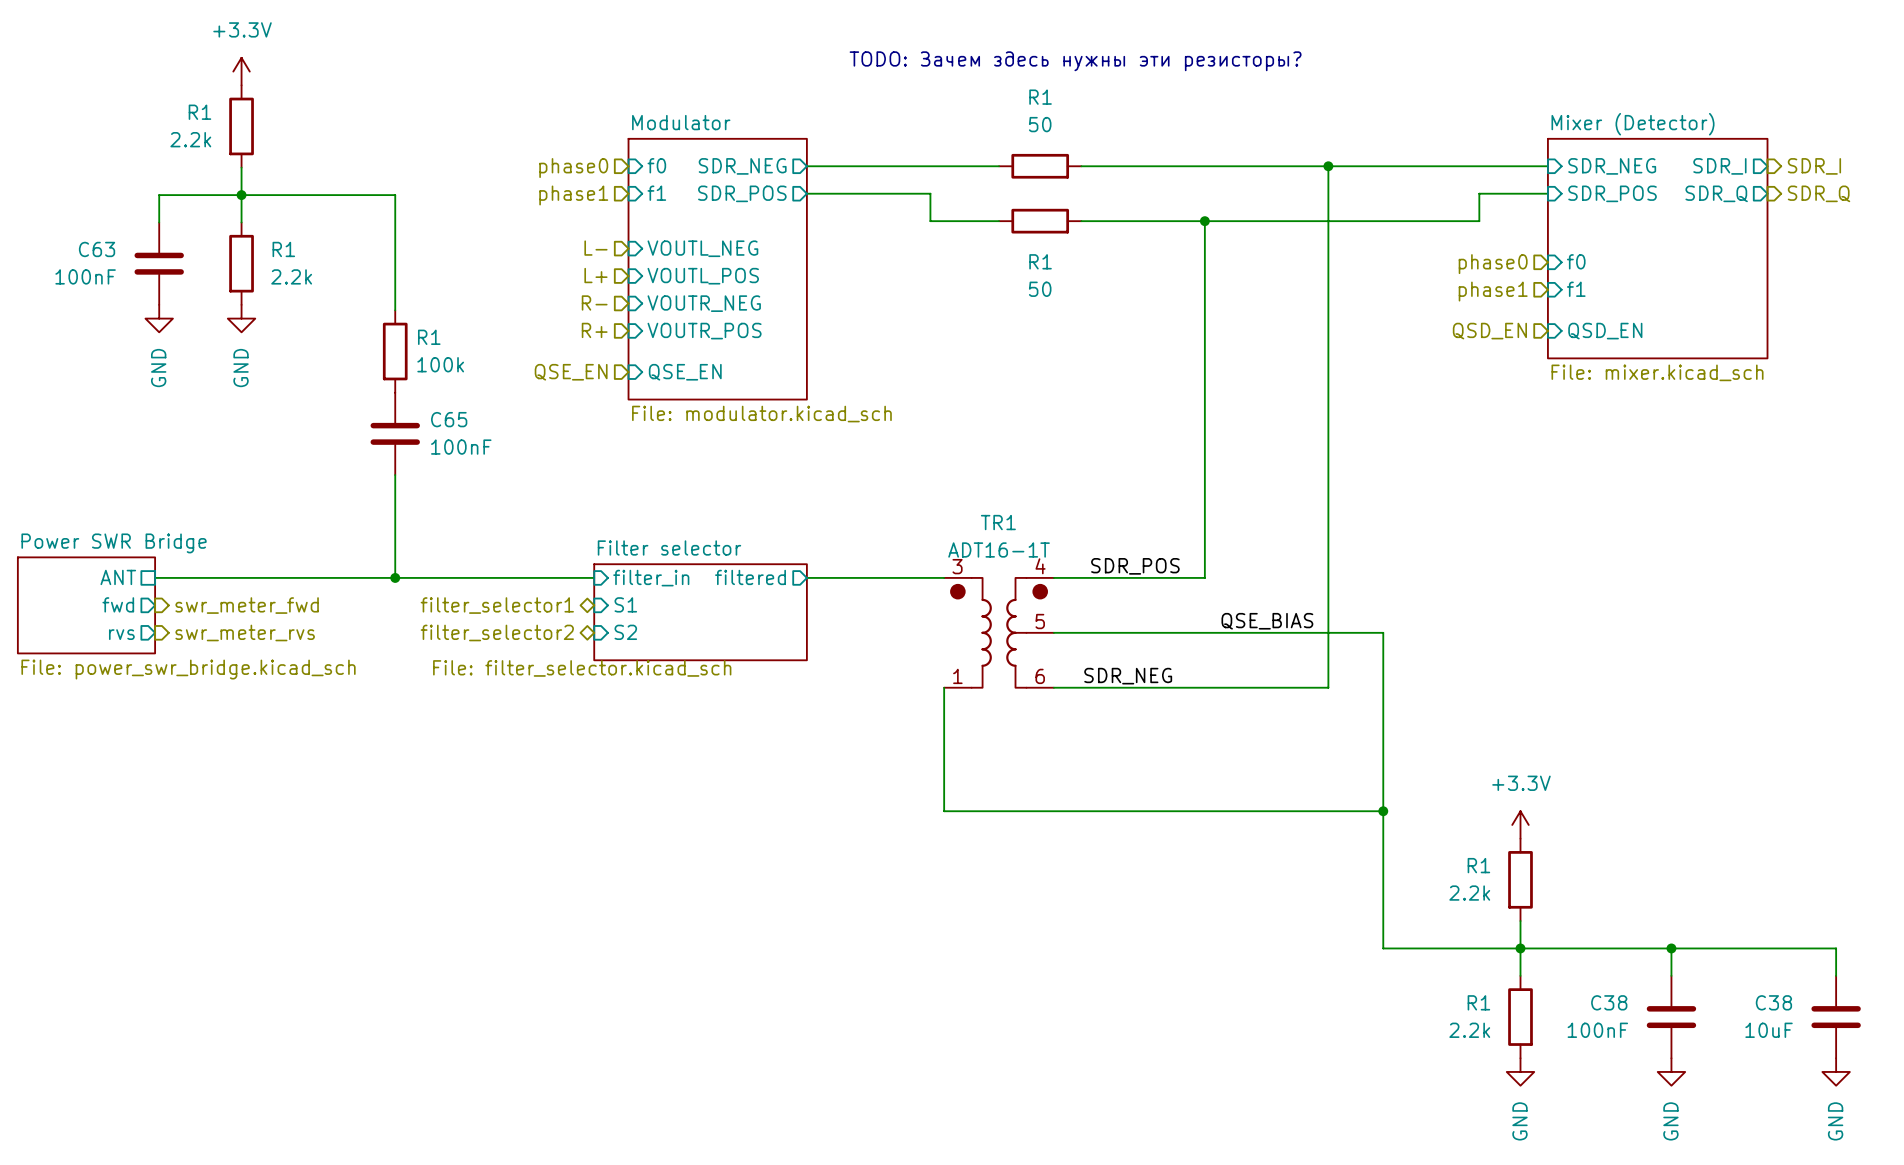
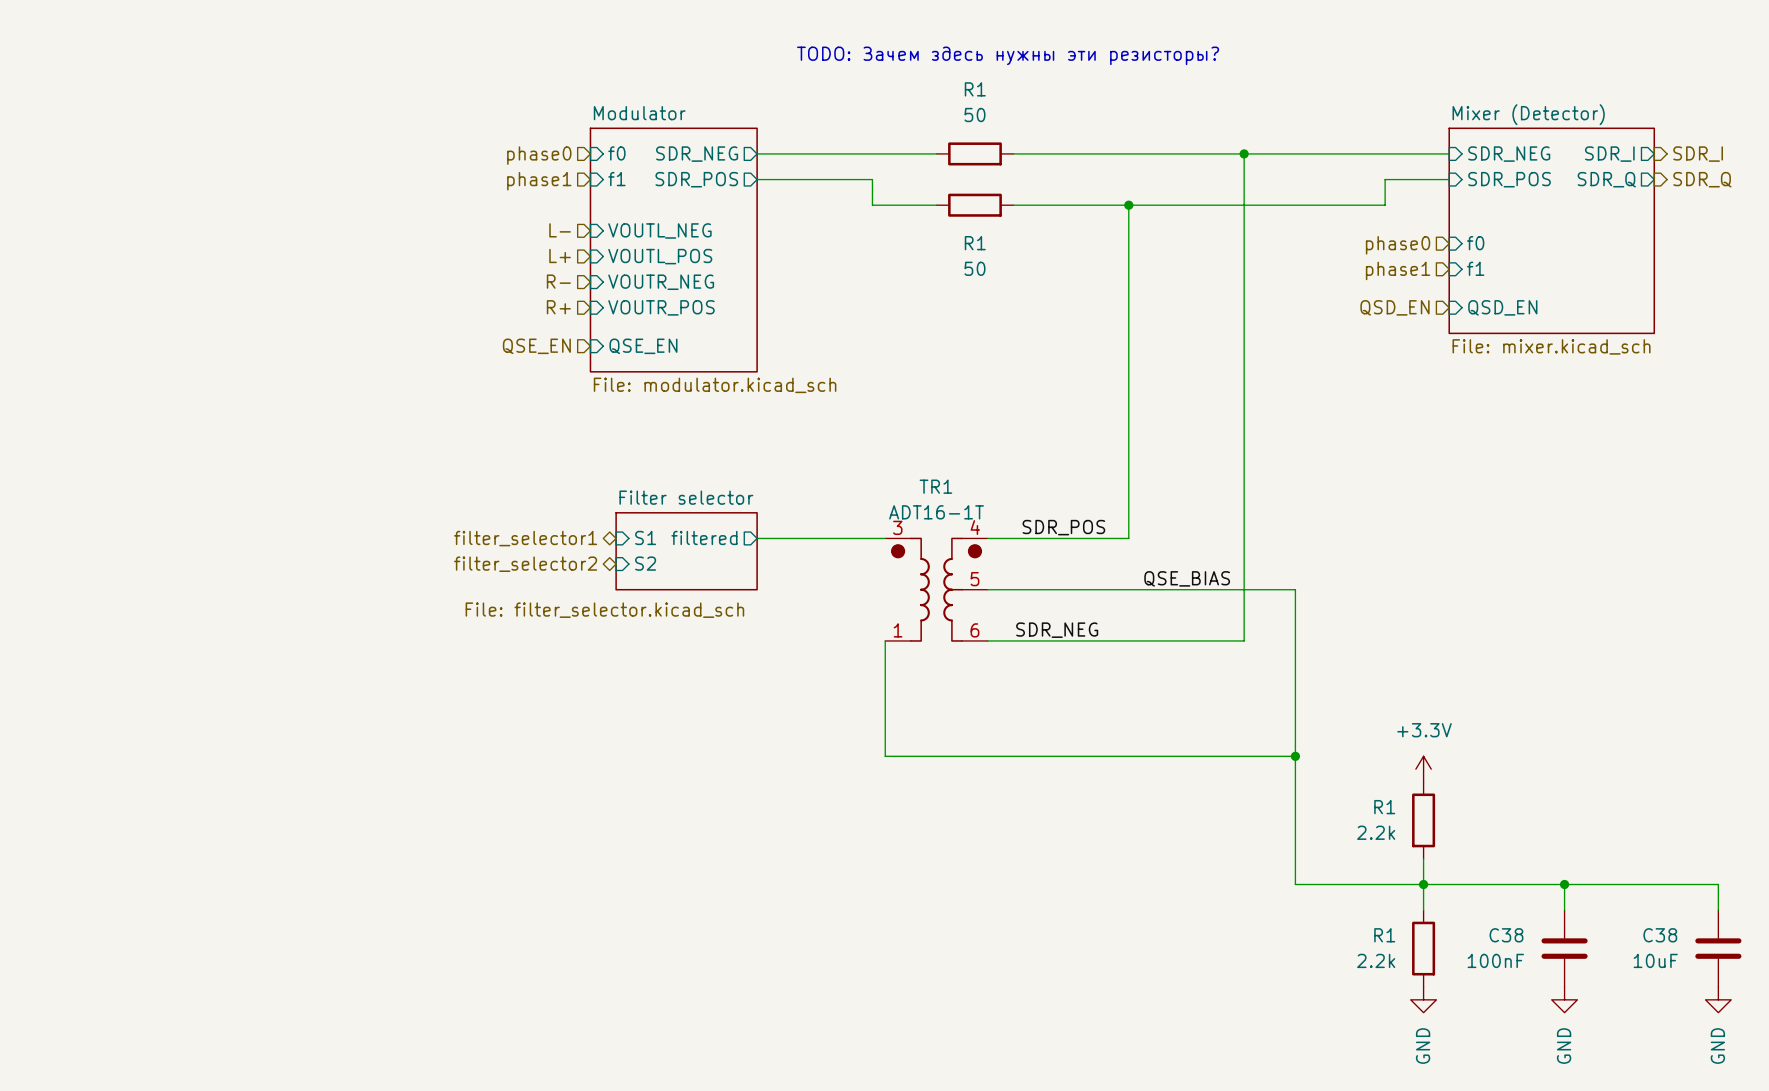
power symbol: +3.3V (241, 71) -> none
R1: 2.2k (241, 126) -> none
wire: (241, 167) (241, 222) -> none
junction: (241, 195) -> none
wire: (159, 222) (159, 195) (395, 195) (395, 310) -> none
C63: 100nF (159, 263) -> none
R1: 2.2k (241, 263) -> none
power symbol: GND (159, 318) -> none
power symbol: GND (241, 318) -> none
R1: 100k (395, 351) -> none
C65: 100nF (395, 433) -> none
wire: (395, 475) (395, 577) -> none
sheet pin: ANT (118, 577) -> none
wire: (155, 577) (594, 577) -> none
junction: (395, 577) -> none
sheet pin: filter_in (651, 578) -> none
sheet Filter selector: none -> File: filter_selector.kicad_sch (686, 551)
sheet pin: fwd (118, 604) -> none
sheet pin position: S1 (625, 604) -> S1 (645, 537)
sheet Power SWR Bridge: File: power_swr_bridge.kicad_sch (86, 605) -> none
hierarchical label: swr_meter_fwd (247, 605) -> none
hierarchical label position: filter_selector1 (497, 605) -> filter_selector1 (525, 538)
sheet Filter selector: File: filter_selector.kicad_sch (700, 612) -> none
hierarchical label: swr_meter_rvs (245, 632) -> none
hierarchical label position: filter_selector2 (497, 632) -> filter_selector2 (525, 564)
sheet pin position: S2 (625, 632) -> S2 (645, 563)
sheet pin: rvs (121, 634) -> none

